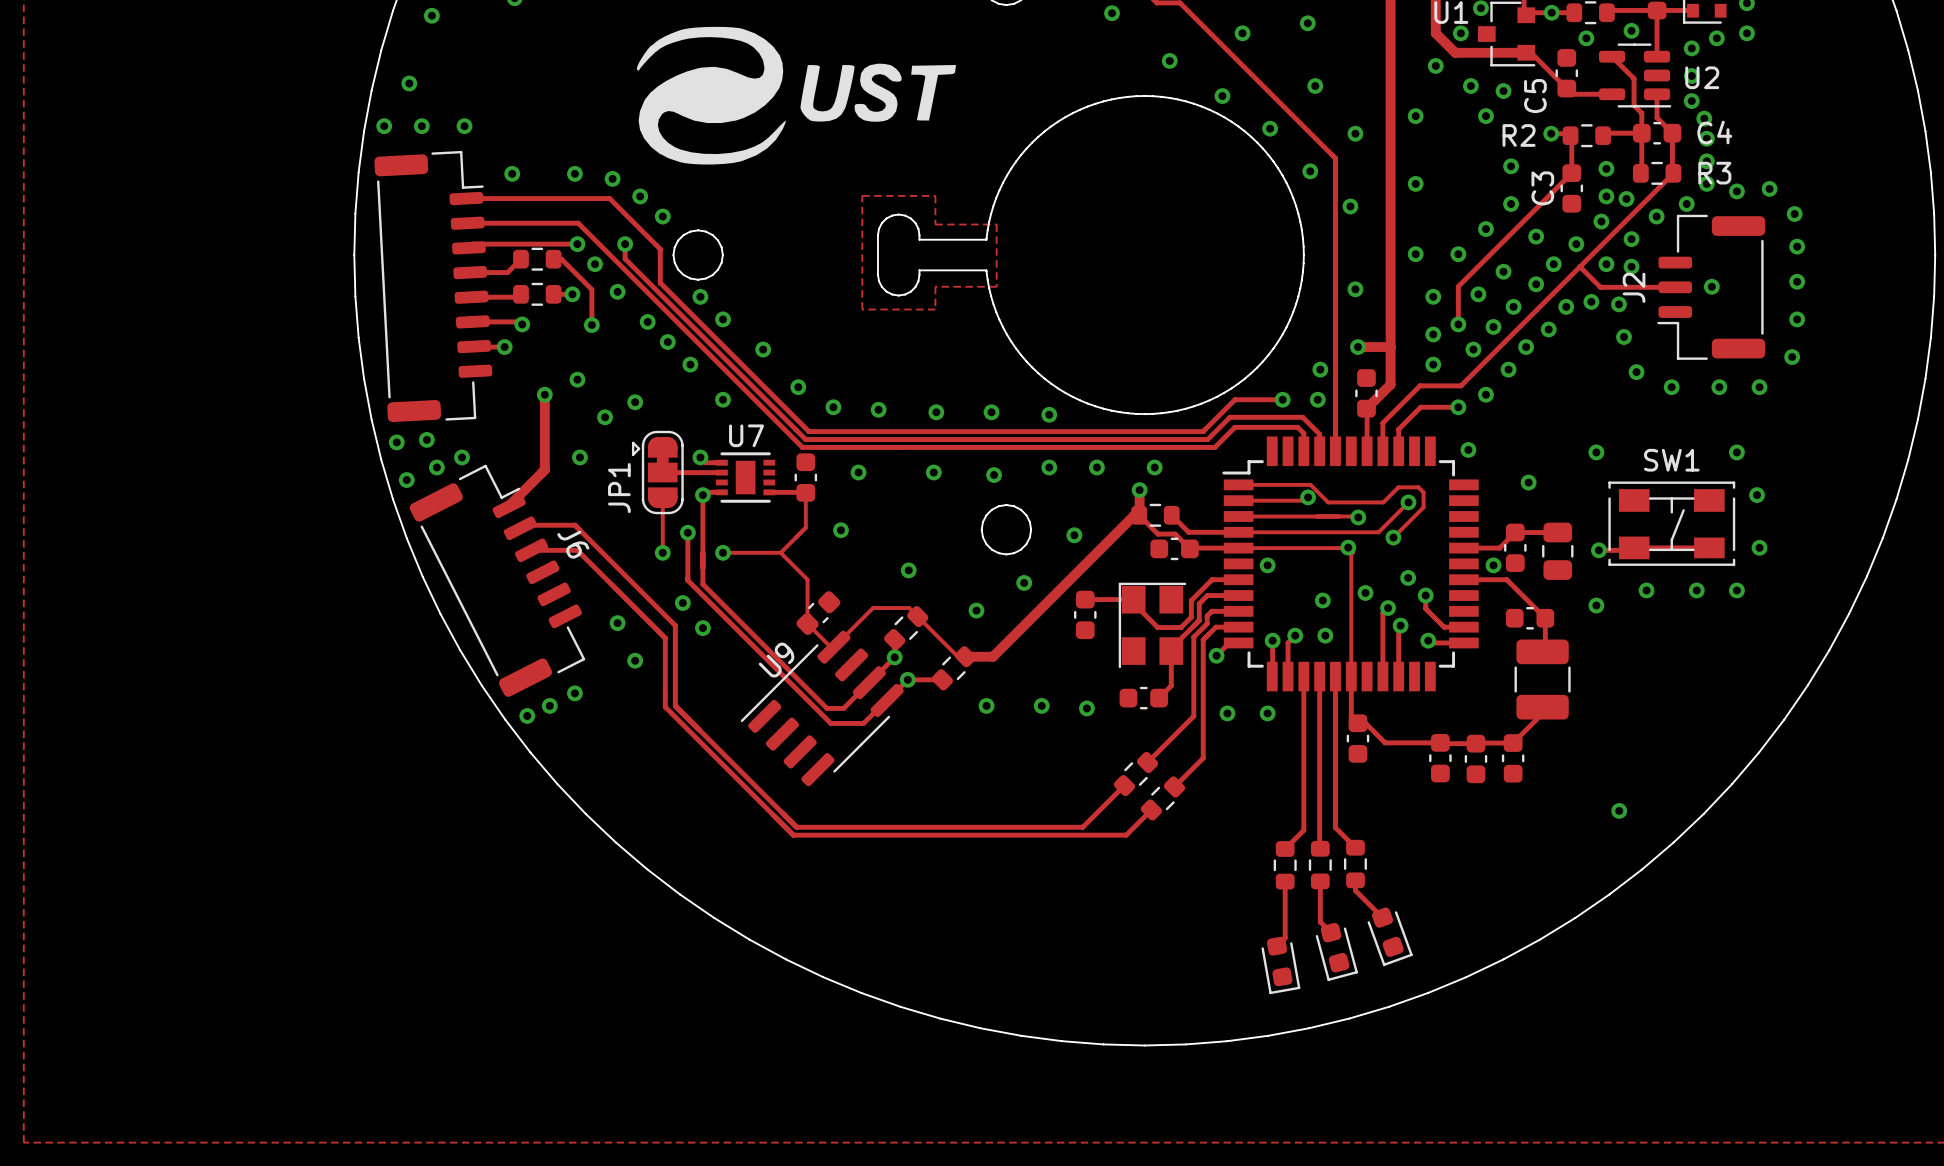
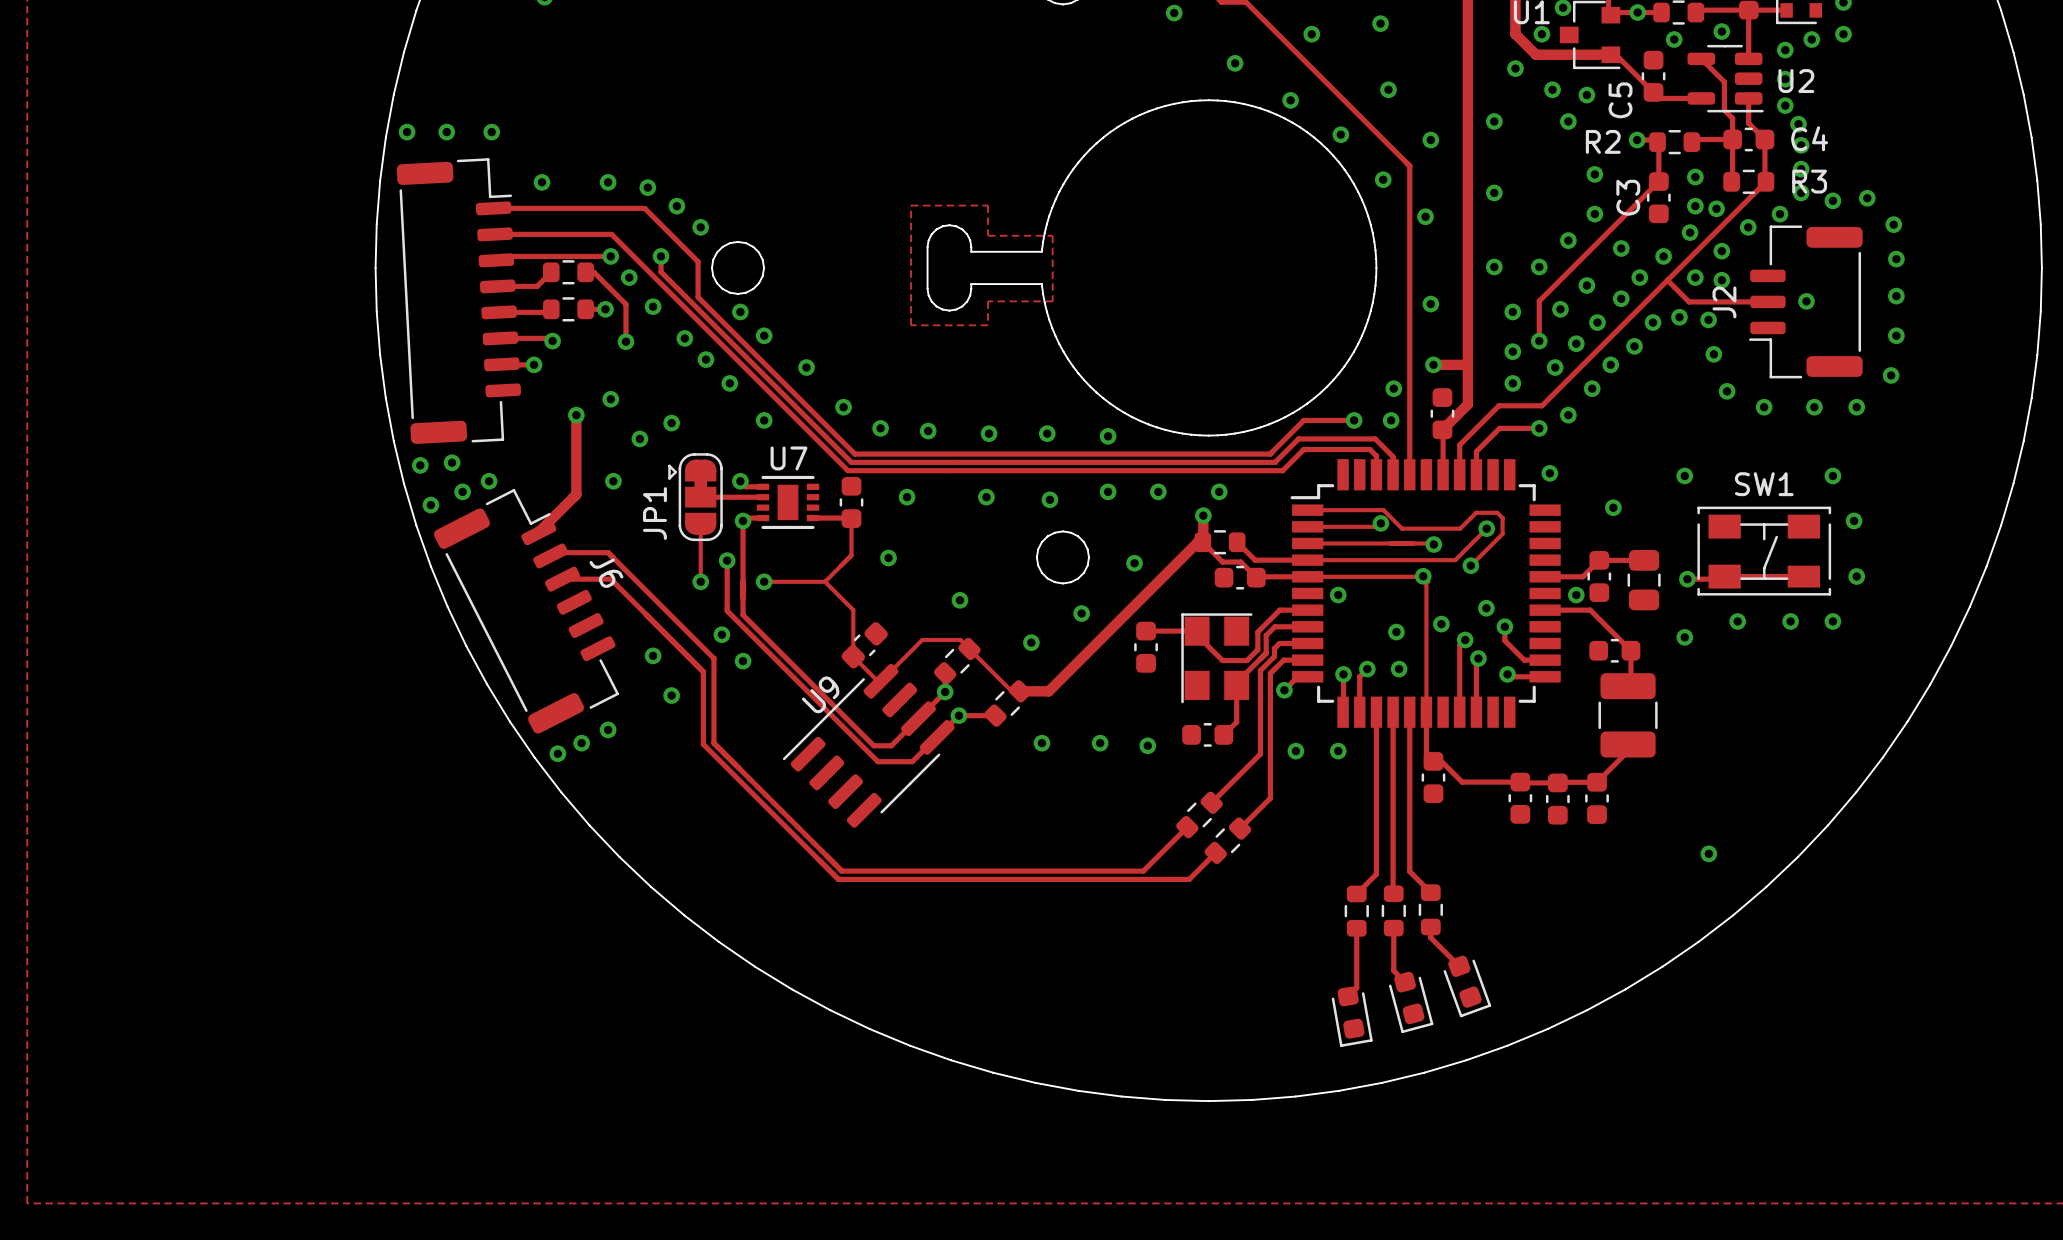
via: (431, 15) -> none
drawing: [636, 26, 956, 165] -> none
via: (409, 83) -> none

